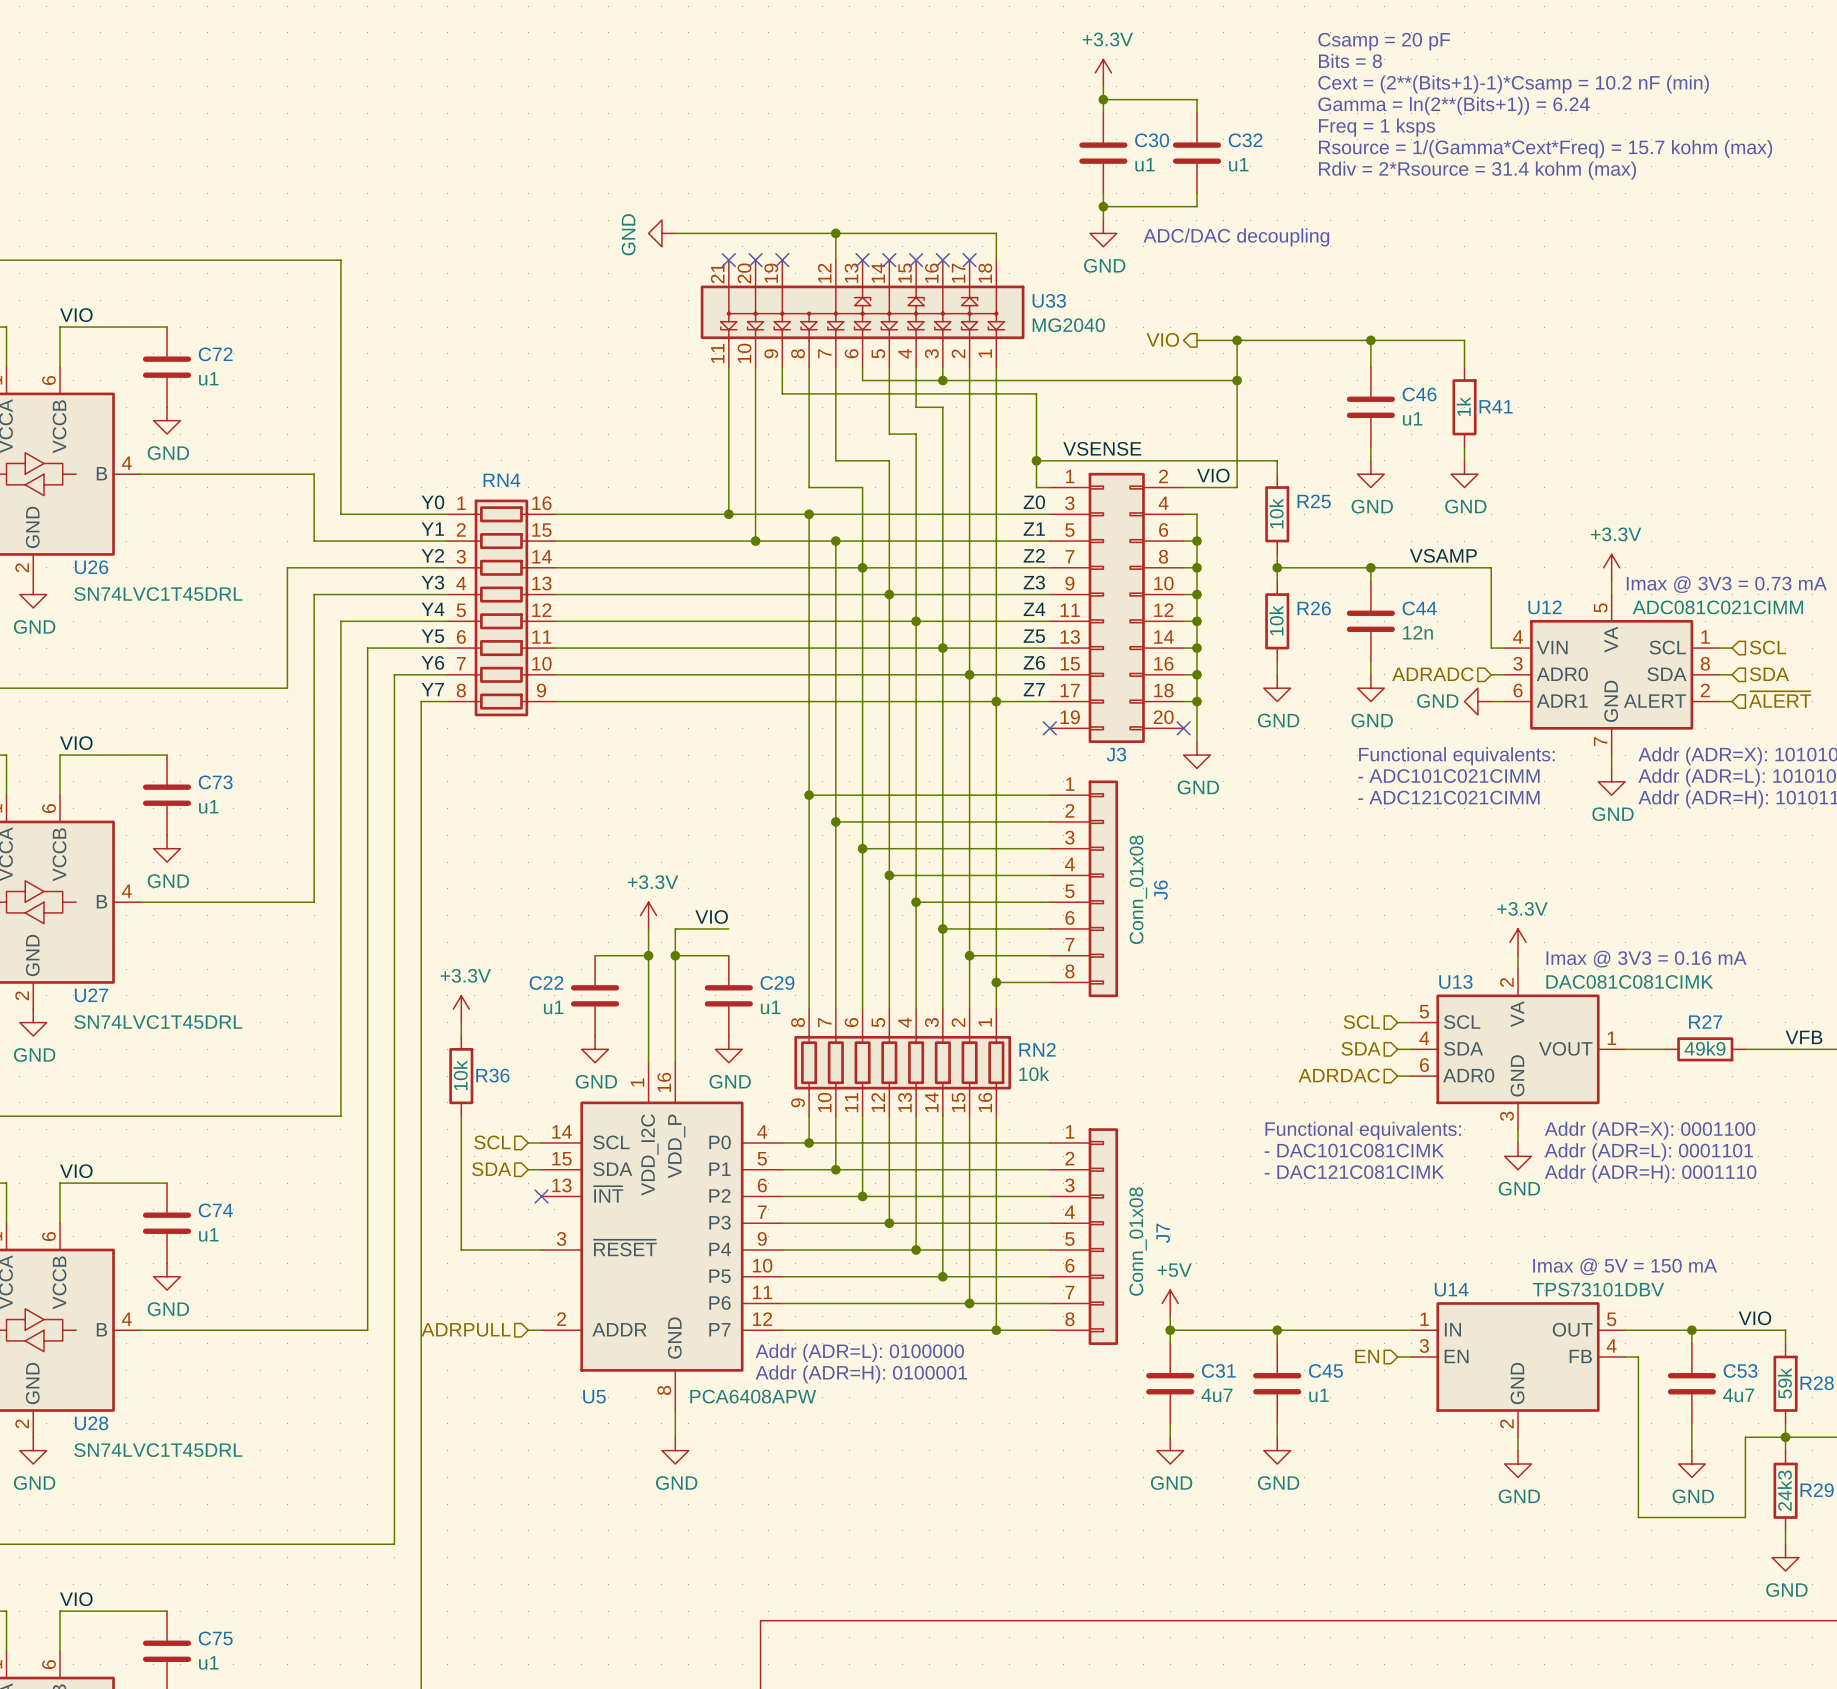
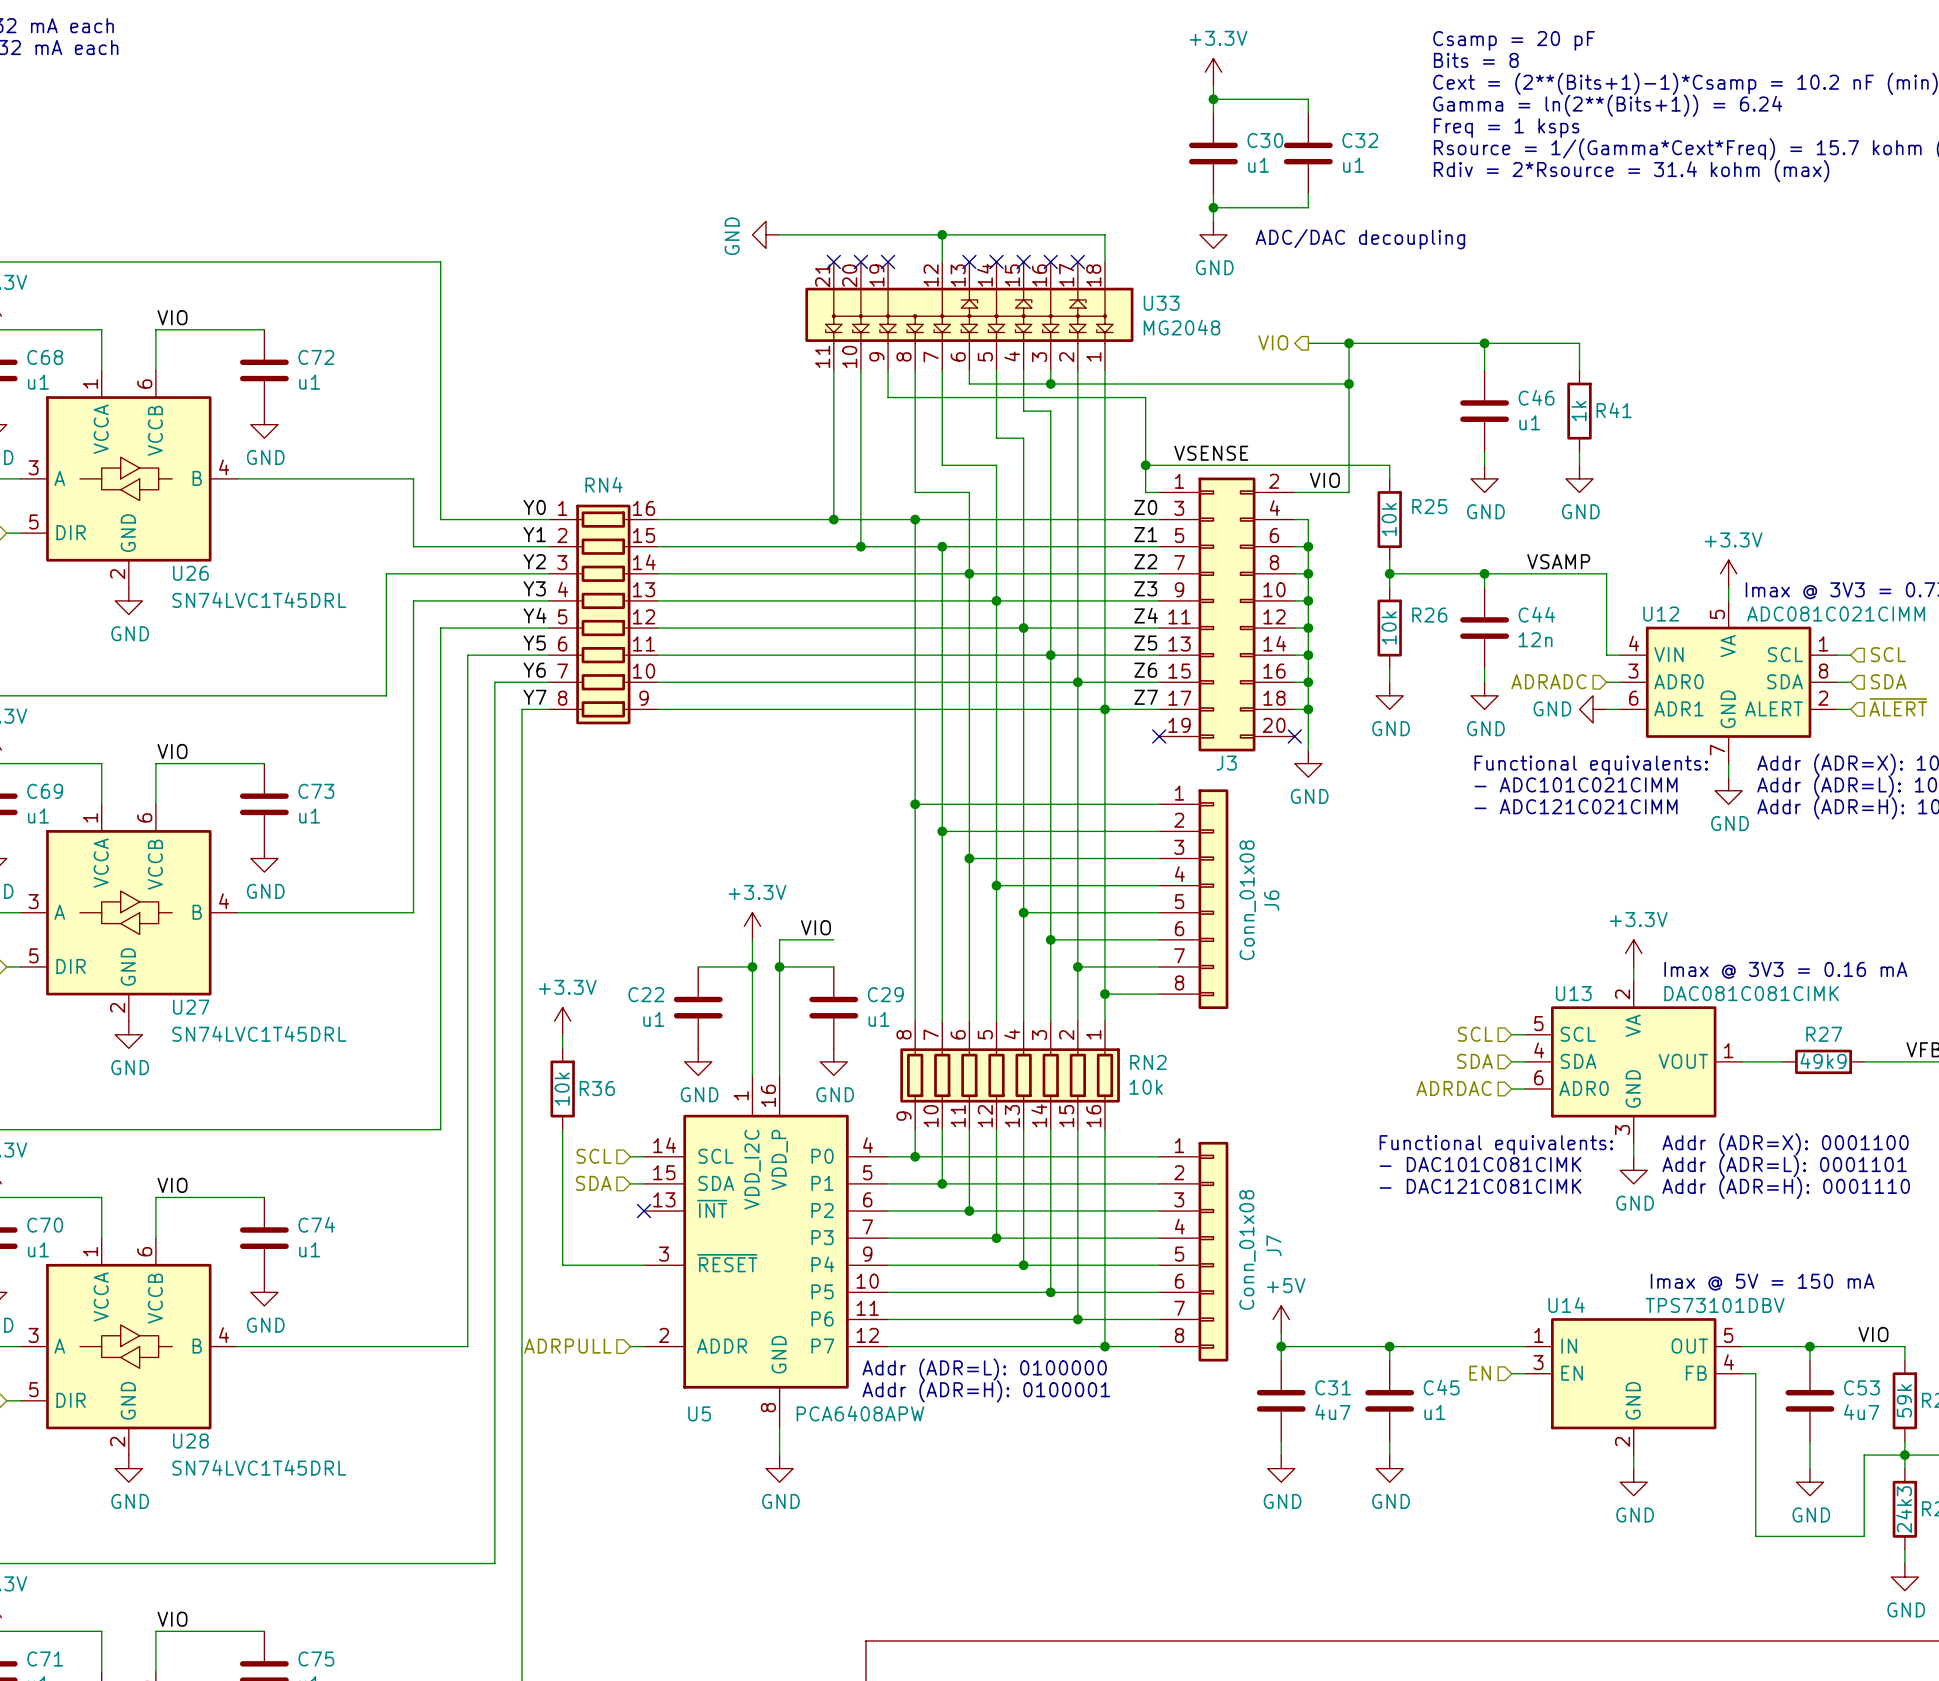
U33 value: MG2040 (1068, 325) -> MG2048 (1181, 327)

